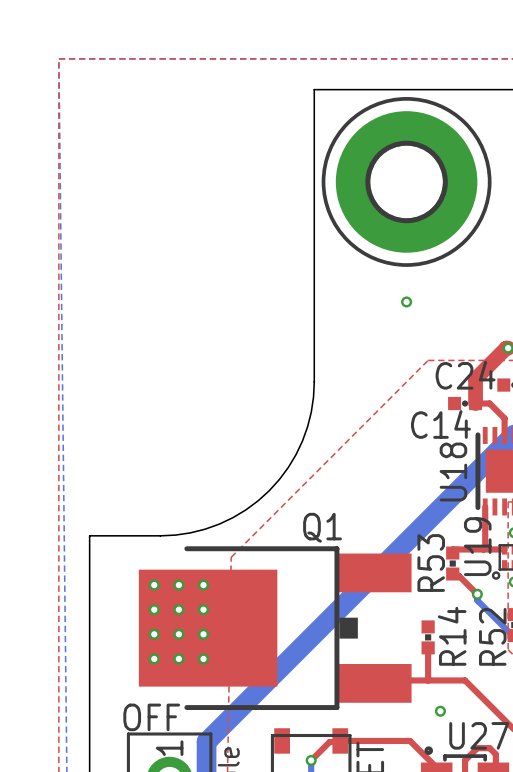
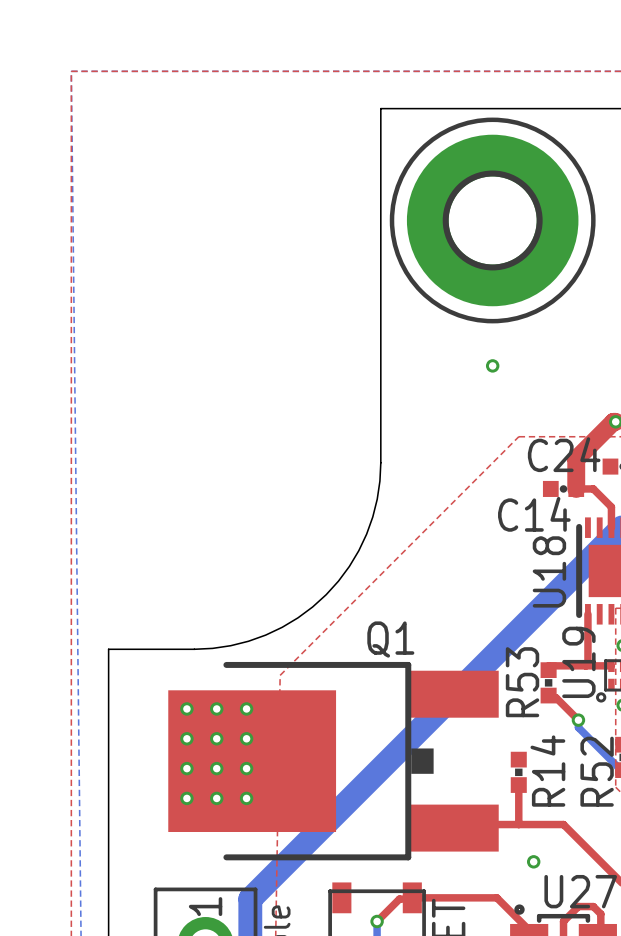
text: OFF (151, 717) -> none

